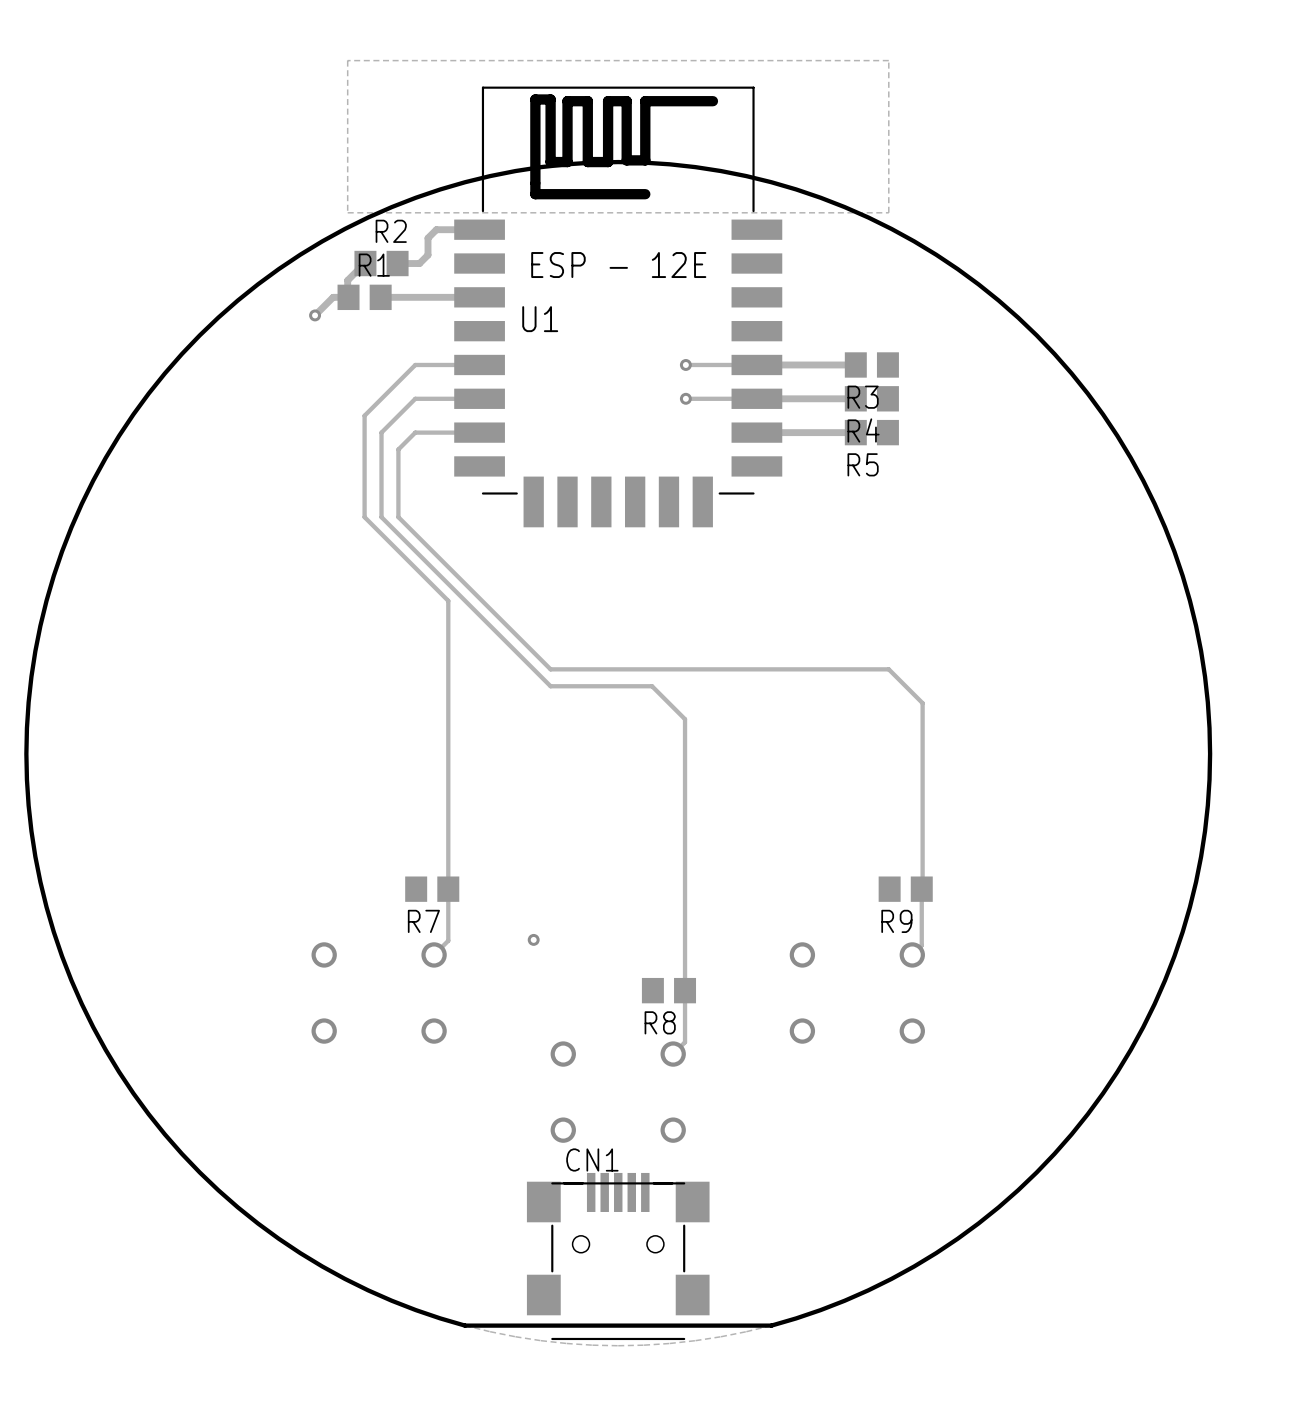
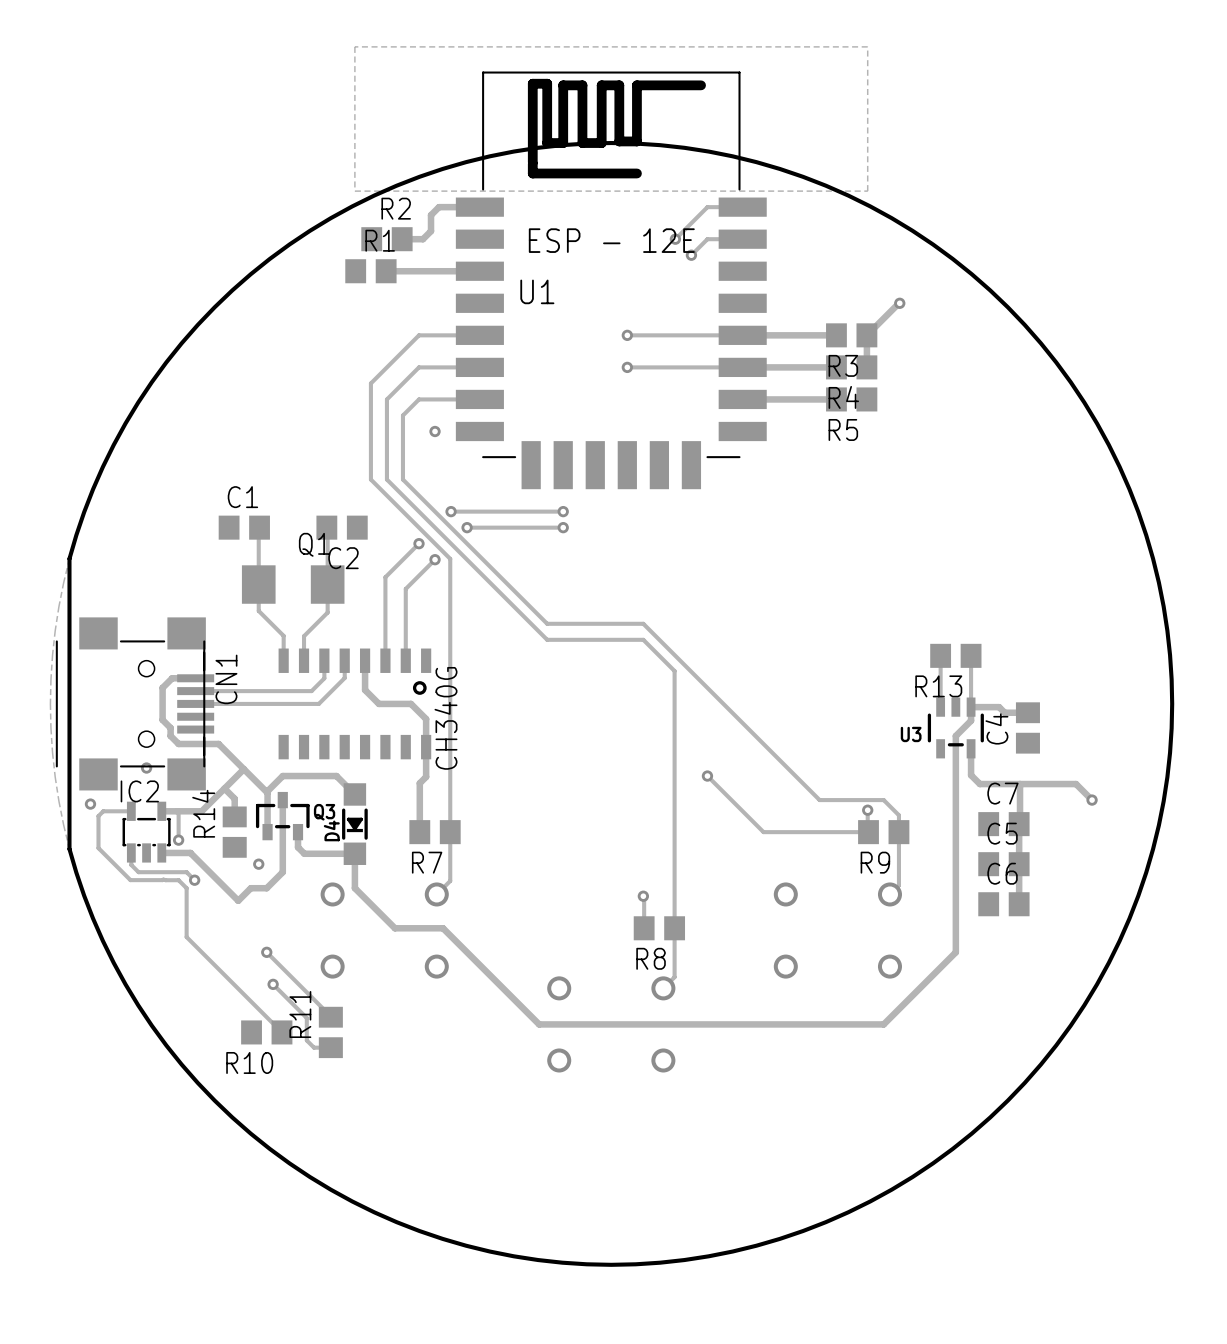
track: none -> (742, 207) (707, 207) (675, 239)
track: (365, 263) (347, 280) (348, 297) (333, 297) (315, 315) -> none
via: none -> (675, 239)
track: none -> (742, 239) (707, 239) (691, 255)
via: none -> (691, 255)
via: (315, 315) -> none
track: none -> (899, 303) (866, 335) (866, 367)
via: none -> (899, 303)
via: none -> (627, 335)
track: none -> (675, 335) (627, 335)
via: (685, 364) -> none
via: none -> (627, 367)
track: none -> (675, 367) (627, 367)
via: (685, 398) -> none
via: none -> (435, 431)
via: none -> (451, 511)
track: none -> (563, 511) (451, 511)
via: none -> (563, 511)
C1: none -> (244, 527)
track: none -> (259, 527) (258, 610) (283, 635) (283, 660)
track: none -> (326, 527) (327, 612) (304, 636) (304, 660)
C2: none -> (342, 527)
via: none -> (467, 527)
track: none -> (563, 527) (467, 527)
via: none -> (563, 527)
track: none -> (419, 543) (385, 577) (385, 660)
via: none -> (419, 543)
track: none -> (435, 559) (405, 588) (405, 660)
via: none -> (435, 559)
Q1: none -> (293, 584)
track: (652, 669) (888, 669) (922, 703) (922, 888) -> (643, 623) (819, 800) (883, 800) (898, 815) (898, 832)
track: none -> (940, 655) (940, 707)
R13: none -> (955, 655)
track: none -> (971, 655) (971, 707)
track: none -> (324, 660) (324, 678) (311, 691) (195, 691)
track: none -> (344, 660) (344, 678) (318, 703) (195, 703)
track: none -> (365, 660) (365, 690) (378, 703) (410, 703) (426, 719) (426, 776) (419, 783) (419, 832)
track: none -> (195, 678) (172, 678) (162, 687) (162, 719) (170, 727) (170, 735) (178, 743) (218, 743) (267, 792)
part: none -> (354, 703)
track: none -> (971, 707) (971, 720) (955, 735) (955, 952) (883, 1024) (539, 1024) (443, 928) (394, 928) (354, 888) (354, 853) (304, 853) (298, 847) (298, 832)
track: none -> (971, 707) (999, 707) (1004, 712) (1027, 712)
U3: none -> (955, 727)
C4: none -> (1027, 727)
track: none -> (971, 748) (971, 775) (979, 784) (1076, 784) (1092, 800)
via: none -> (146, 768)
track: none -> (243, 769) (201, 811) (161, 811)
track: none -> (707, 776) (763, 832) (868, 832) (867, 810)
via: none -> (707, 776)
track: none -> (1020, 784) (1019, 904)
track: none -> (224, 788) (234, 798) (234, 816)
track: none -> (354, 794) (336, 776) (282, 776) (267, 791) (267, 832)
track: none -> (282, 800) (282, 872) (266, 888) (250, 888) (238, 900) (190, 852) (161, 852)
via: none -> (1092, 800)
via: none -> (90, 804)
via: none -> (867, 810)
track: none -> (131, 811) (103, 811) (98, 816) (98, 848) (130, 880) (178, 880) (186, 888) (186, 937) (281, 1032)
track: none -> (177, 811) (178, 840)
Q3: none -> (282, 816)
D4: none -> (354, 824)
C7: none -> (1003, 824)
IC2: none -> (146, 832)
R14: none -> (234, 832)
via: none -> (178, 840)
track: none -> (131, 852) (131, 864) (138, 872) (186, 872) (194, 880)
via: none -> (258, 864)
C5: none -> (1003, 864)
via: none -> (194, 880)
via: (533, 939) -> none
track: none -> (643, 896) (644, 928)
via: none -> (643, 896)
C6: none -> (1003, 904)
track: none -> (266, 952) (330, 1017)
via: none -> (266, 952)
track: none -> (273, 984) (306, 1018) (306, 1040) (314, 1047) (330, 1047)
via: none -> (273, 984)
R10: none -> (266, 1032)
R11: none -> (330, 1032)
CN1 rotation: 0° (618, 1256) -> 90° clockwise (134, 703)
CN1 position: (618, 1256) -> (134, 703)
board edge: (771, 1325) (465, 1325) (391, 1300) (322, 1266) (278, 1238) (237, 1207) (181, 1153) (148, 1114) (119, 1071) (93, 1027) (62, 956) (46, 907) (35, 856) (26, 779) (26, 728) (31, 676) (40, 625) (62, 551) (81, 503) (105, 457) (133, 414) (181, 354) (218, 317) (257, 284) (300, 254) (344, 228) (415, 197) (465, 182) (540, 167) (592, 162) (644, 162) (695, 167) (746, 176) (796, 189) (868, 217) (914, 241) (957, 269) (998, 300) (1054, 354) (1087, 393) (1117, 435) (1143, 480) (1174, 551) (1189, 600) (1201, 651) (1209, 728) (1209, 779) (1205, 831) (1196, 882) (1174, 956) (1154, 1004) (1130, 1049) (1103, 1093) (1054, 1153) (1018, 1190) (978, 1223) (936, 1253) (891, 1278) (820, 1310) (771, 1325) -> (69, 558) (84, 512) (113, 444) (138, 402) (166, 362) (197, 324) (232, 290) (289, 244) (330, 218) (374, 195) (419, 176) (489, 156) (538, 147) (586, 143) (635, 143) (708, 151) (756, 162) (803, 176) (870, 206) (912, 230) (952, 258) (990, 290) (1040, 343) (1070, 382) (1097, 423) (1119, 466) (1146, 535) (1158, 582) (1167, 630) (1171, 679) (1171, 728) (1167, 777) (1153, 849) (1138, 895) (1108, 962) (1084, 1005) (1056, 1045) (1024, 1082) (990, 1117) (933, 1163) (891, 1189) (848, 1212) (803, 1231) (732, 1251) (684, 1260) (635, 1264) (586, 1264) (513, 1256) (466, 1245) (419, 1231) (352, 1201) (309, 1176) (269, 1148) (232, 1117) (181, 1064) (151, 1025) (125, 984) (93, 918) (69, 849) (69, 558)

